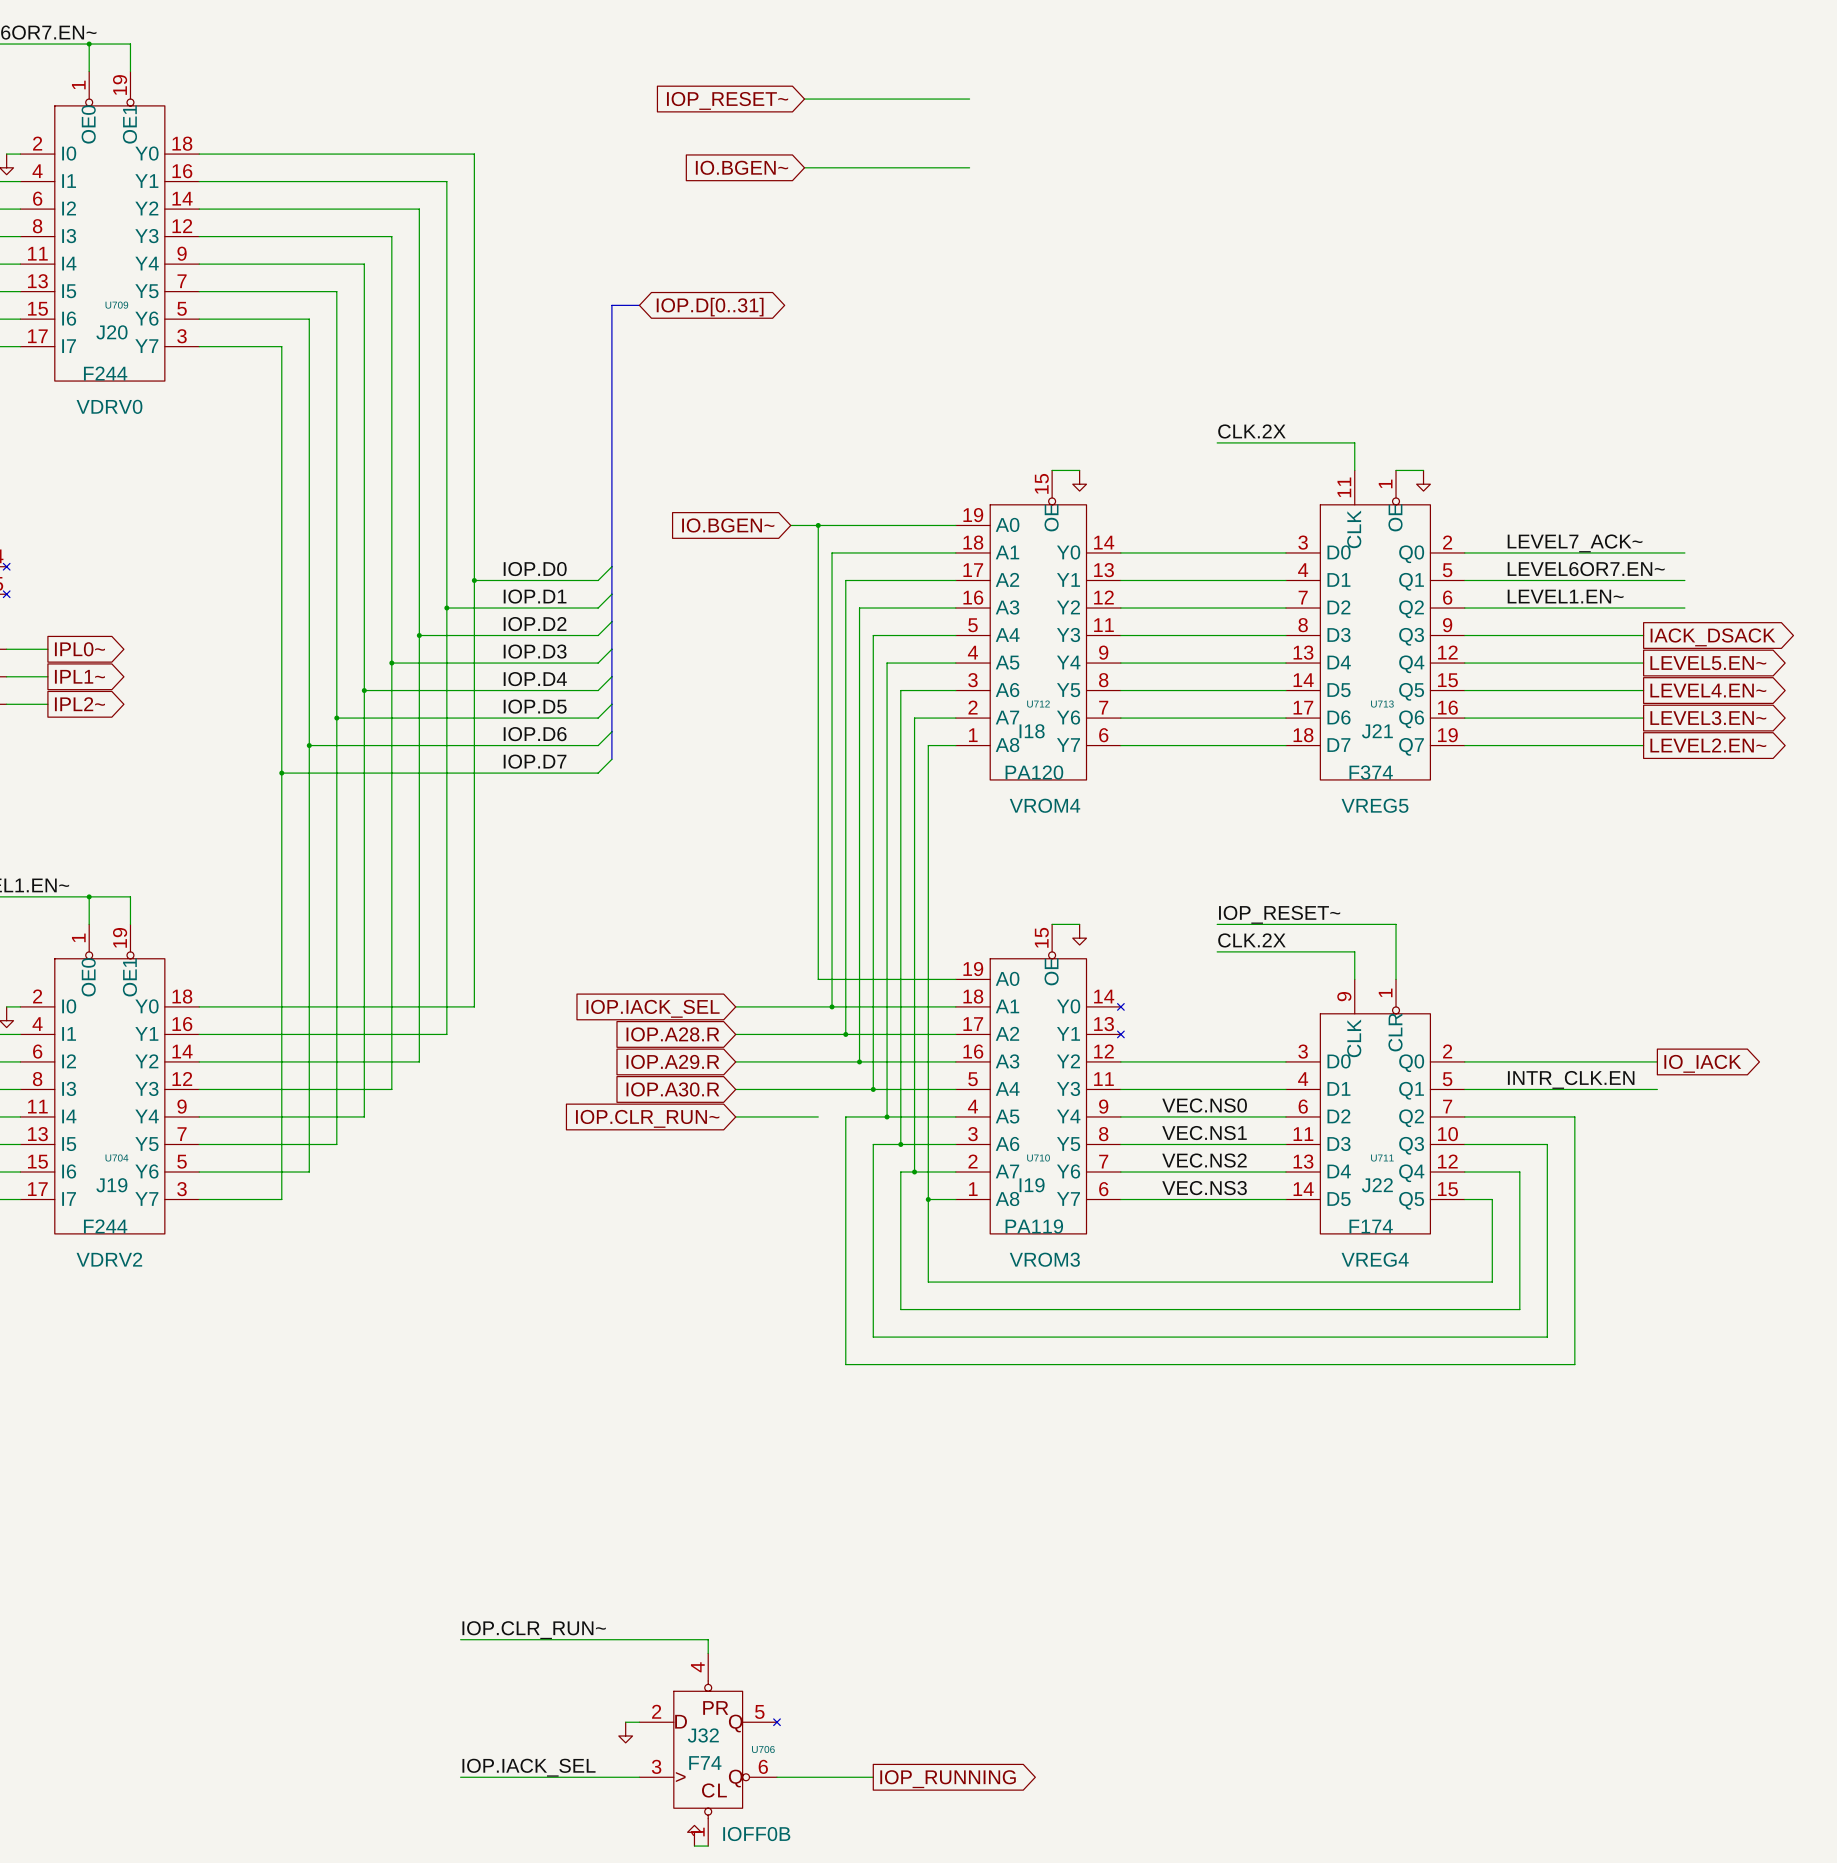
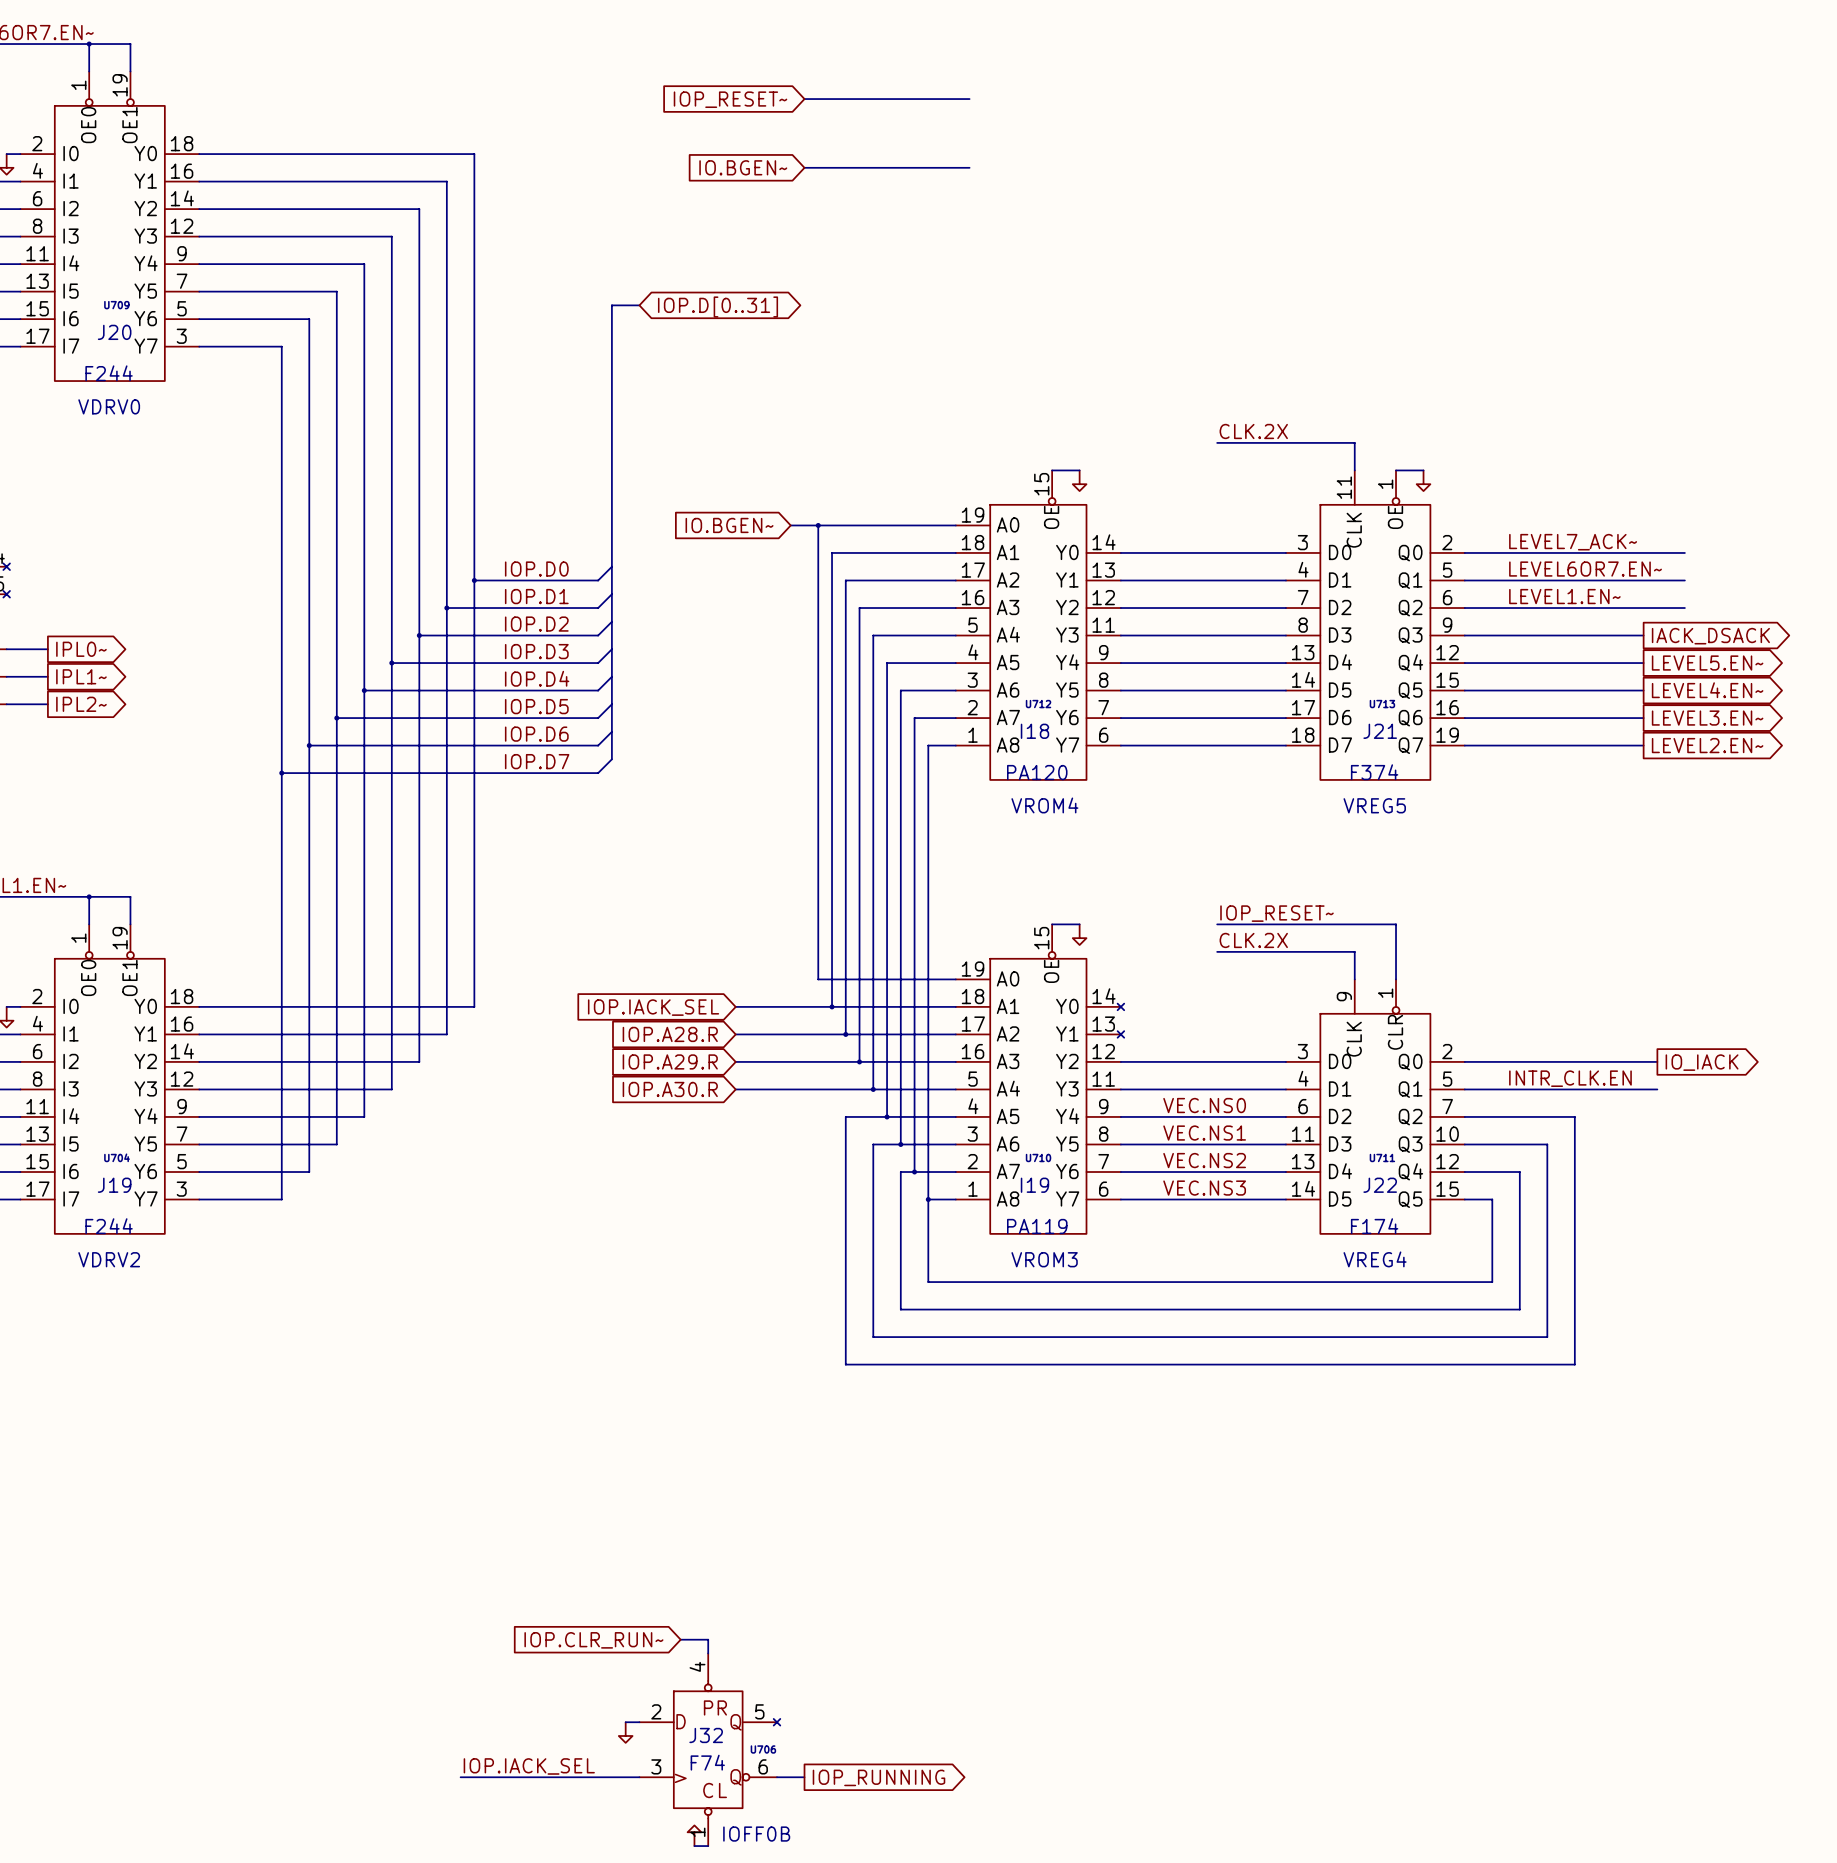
wire: (735, 1116) (818, 1116) -> none
global label: IOP.CLR_RUN~ (647, 1118) -> none
label: IOP.CLR_RUN~ (534, 1630) -> none
wire: (460, 1639) (680, 1639) -> none
global label: none -> IOP.CLR_RUN~ (593, 1640)
wire: (804, 1777) (873, 1777) -> none
global label position: IOP_RUNNING (948, 1779) -> IOP_RUNNING (878, 1777)

